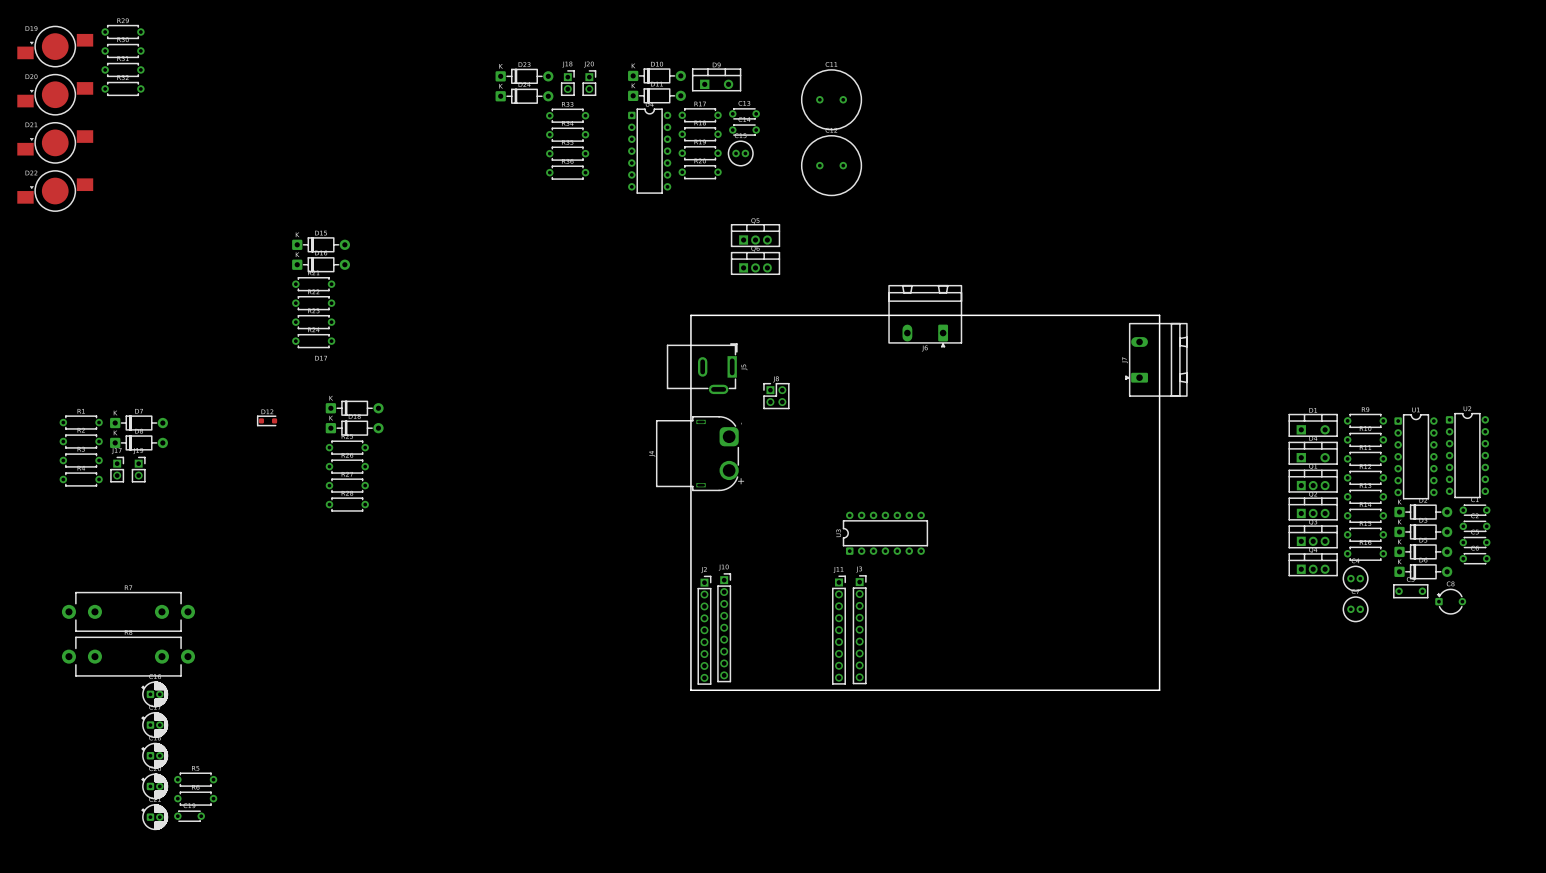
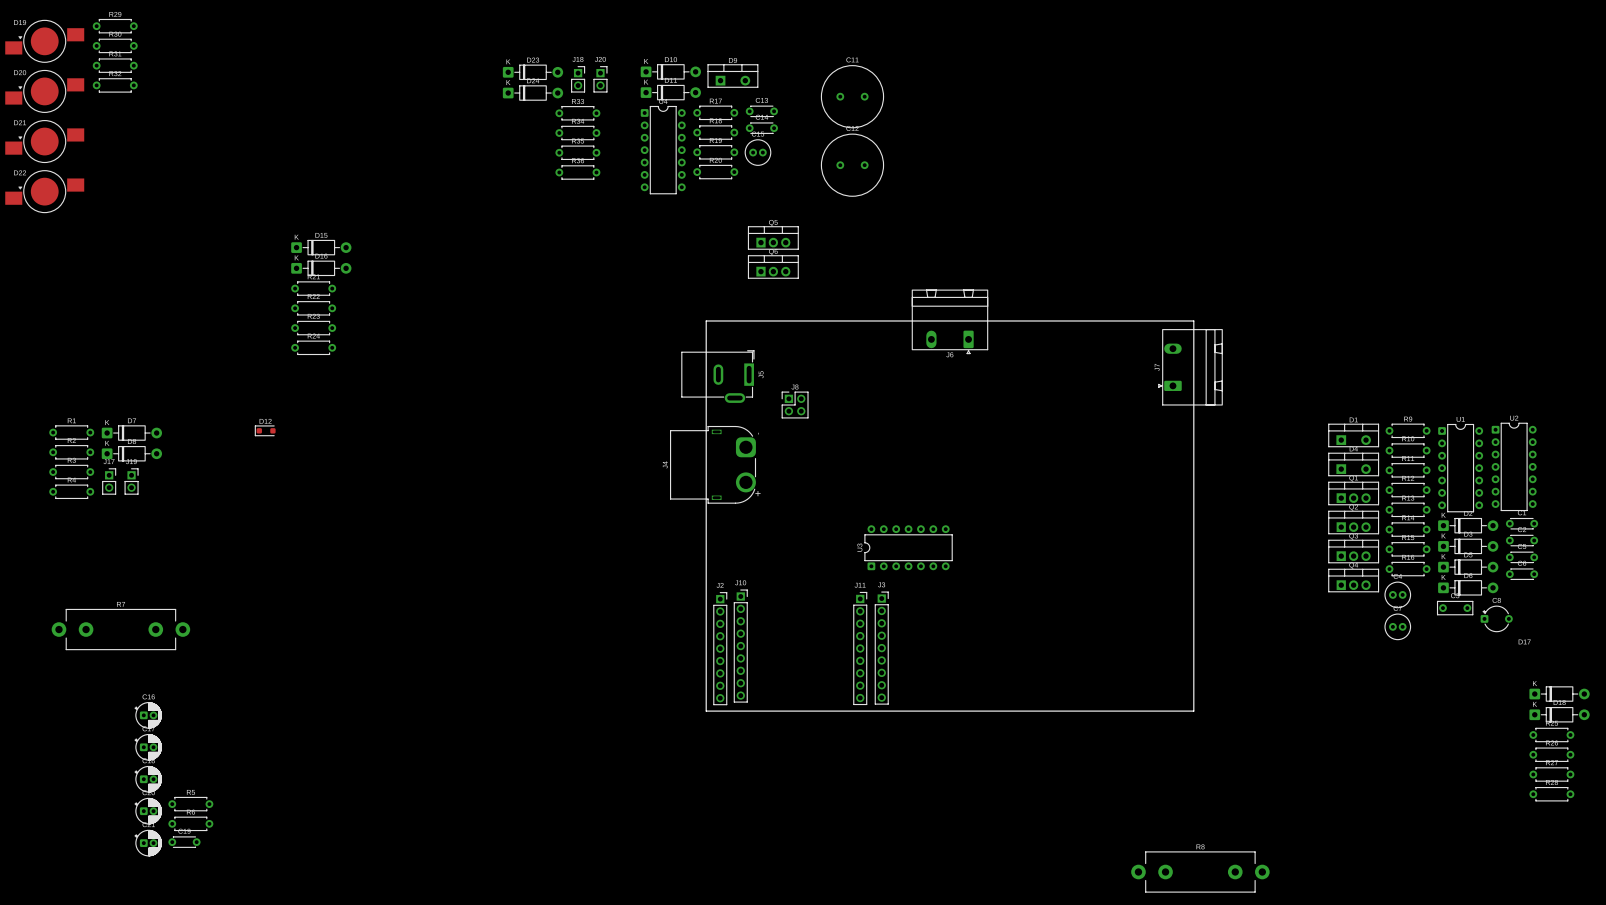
part position: (354, 408) -> (1559, 694)
part position: (354, 428) -> (1559, 714)
part position: (347, 447) -> (1551, 734)
part position: (347, 466) -> (1551, 754)
part position: (347, 485) -> (1551, 774)
part position: (347, 504) -> (1551, 794)
part position: (128, 656) -> (1200, 872)

